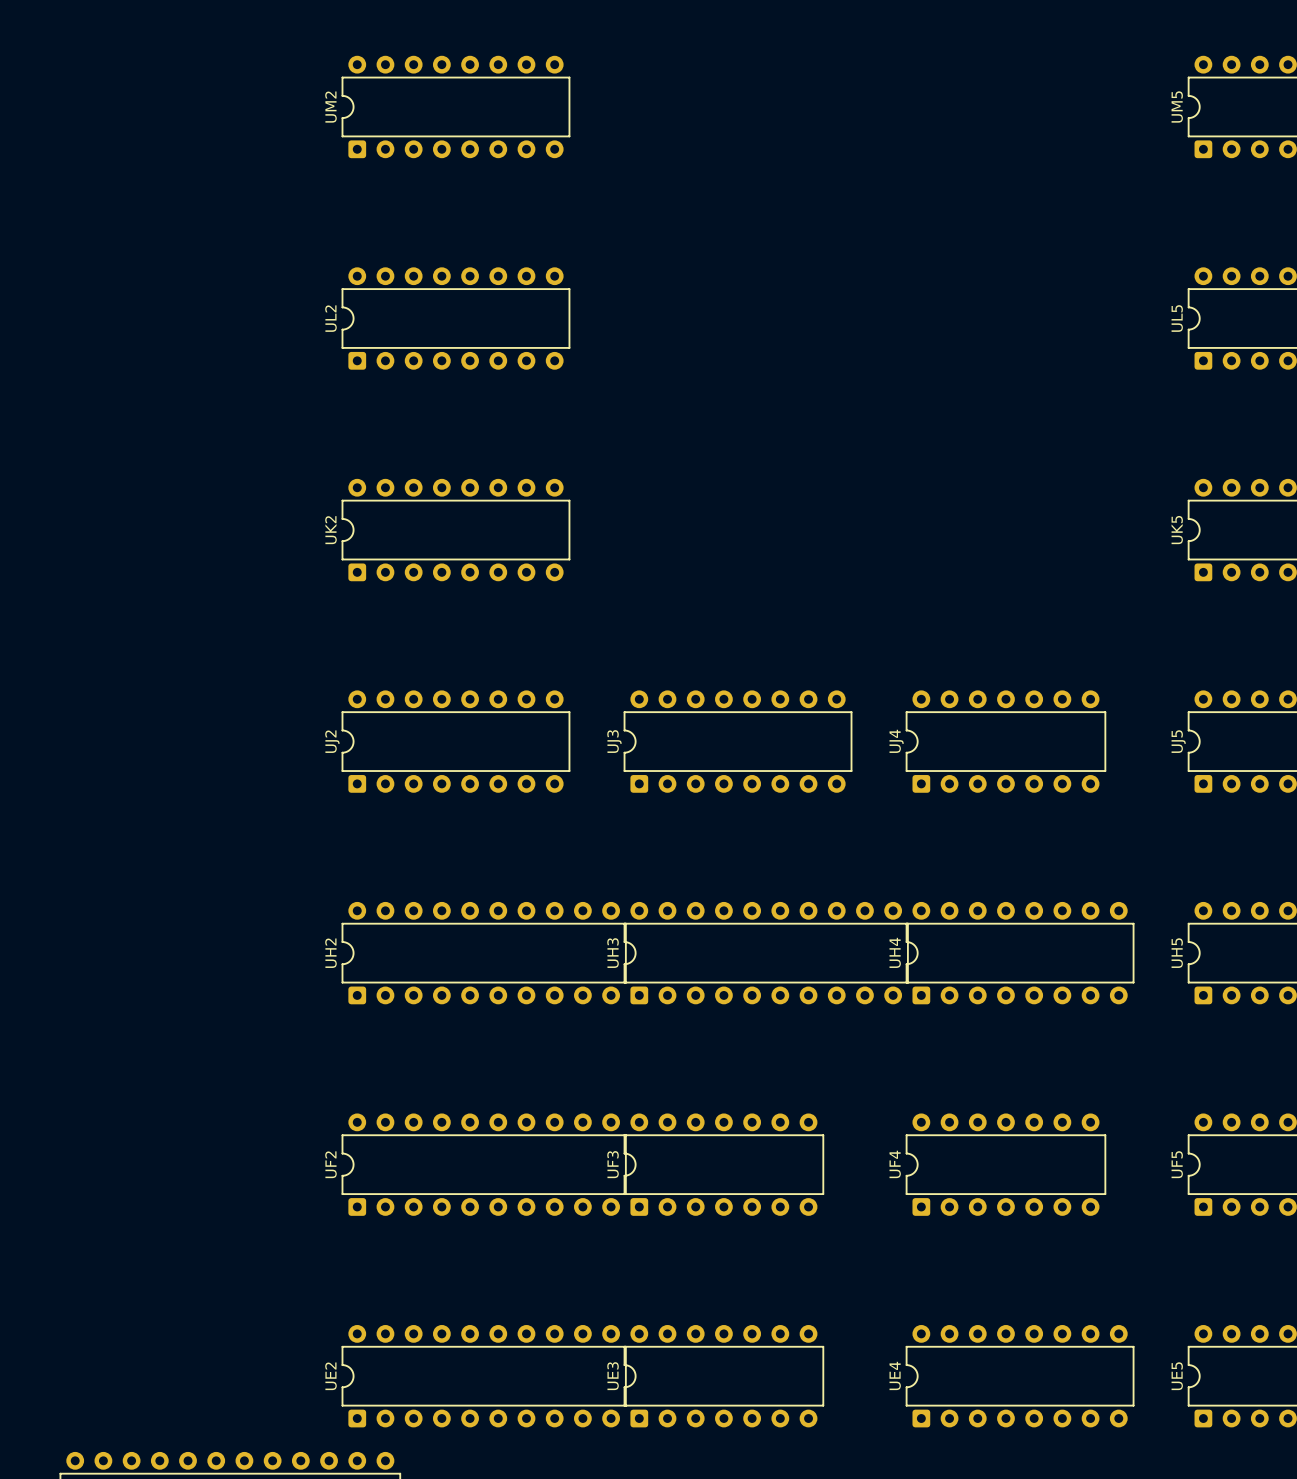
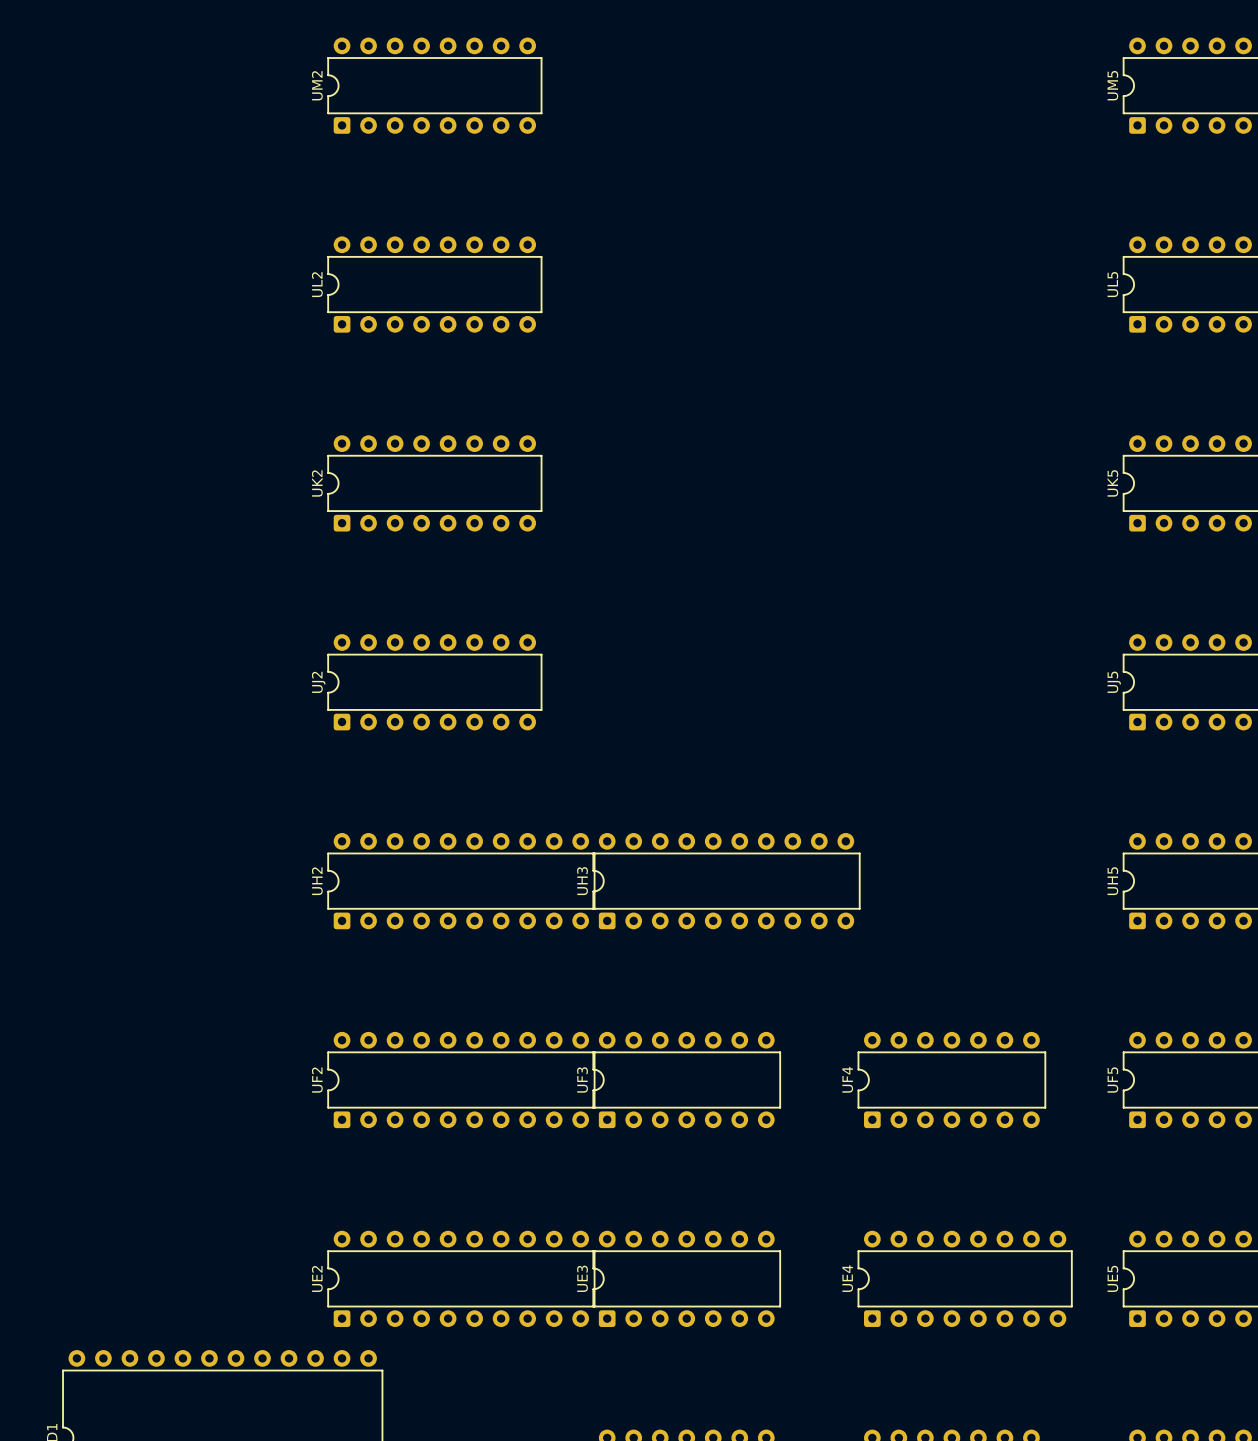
UJ3: (738, 741) -> none
UJ4: (1005, 741) -> none
UH4: (1020, 953) -> none

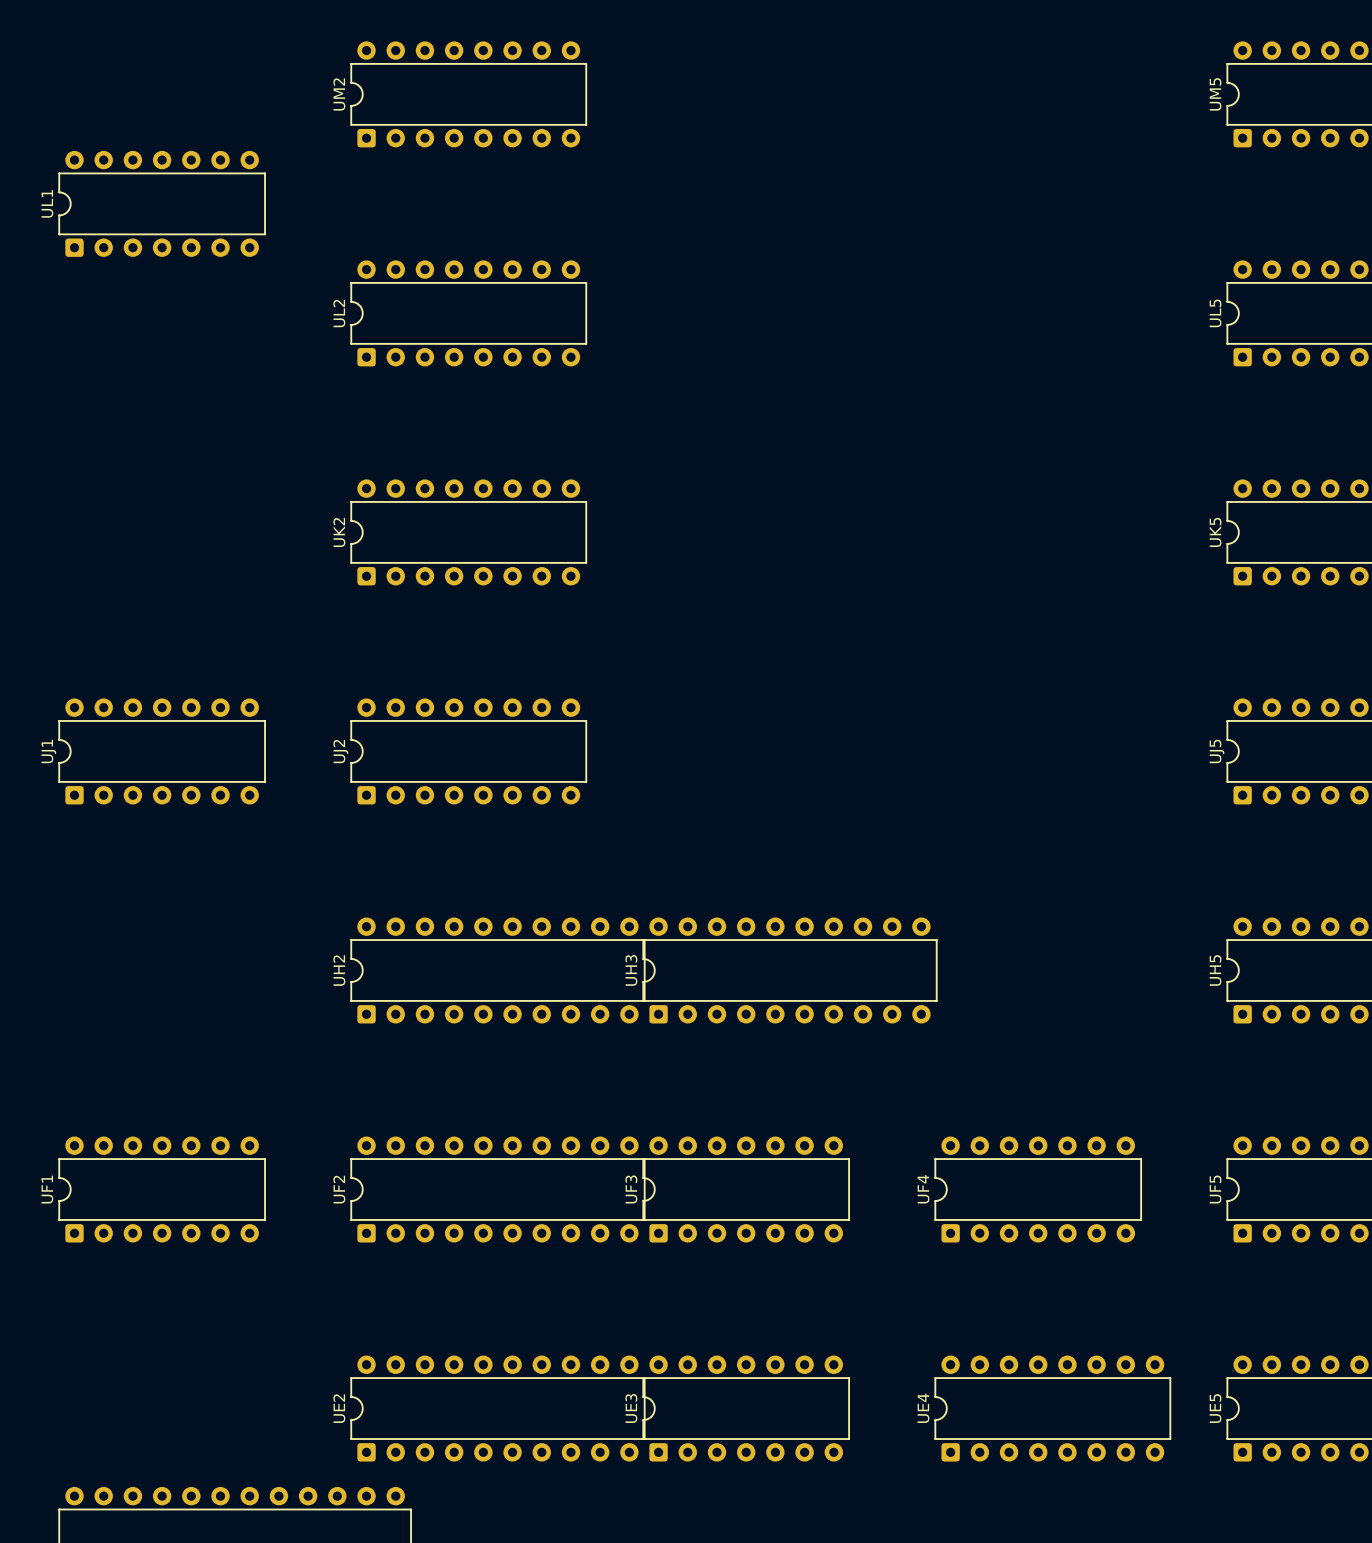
UL1: none -> (162, 203)
UJ1: none -> (162, 751)
UF1: none -> (162, 1189)

